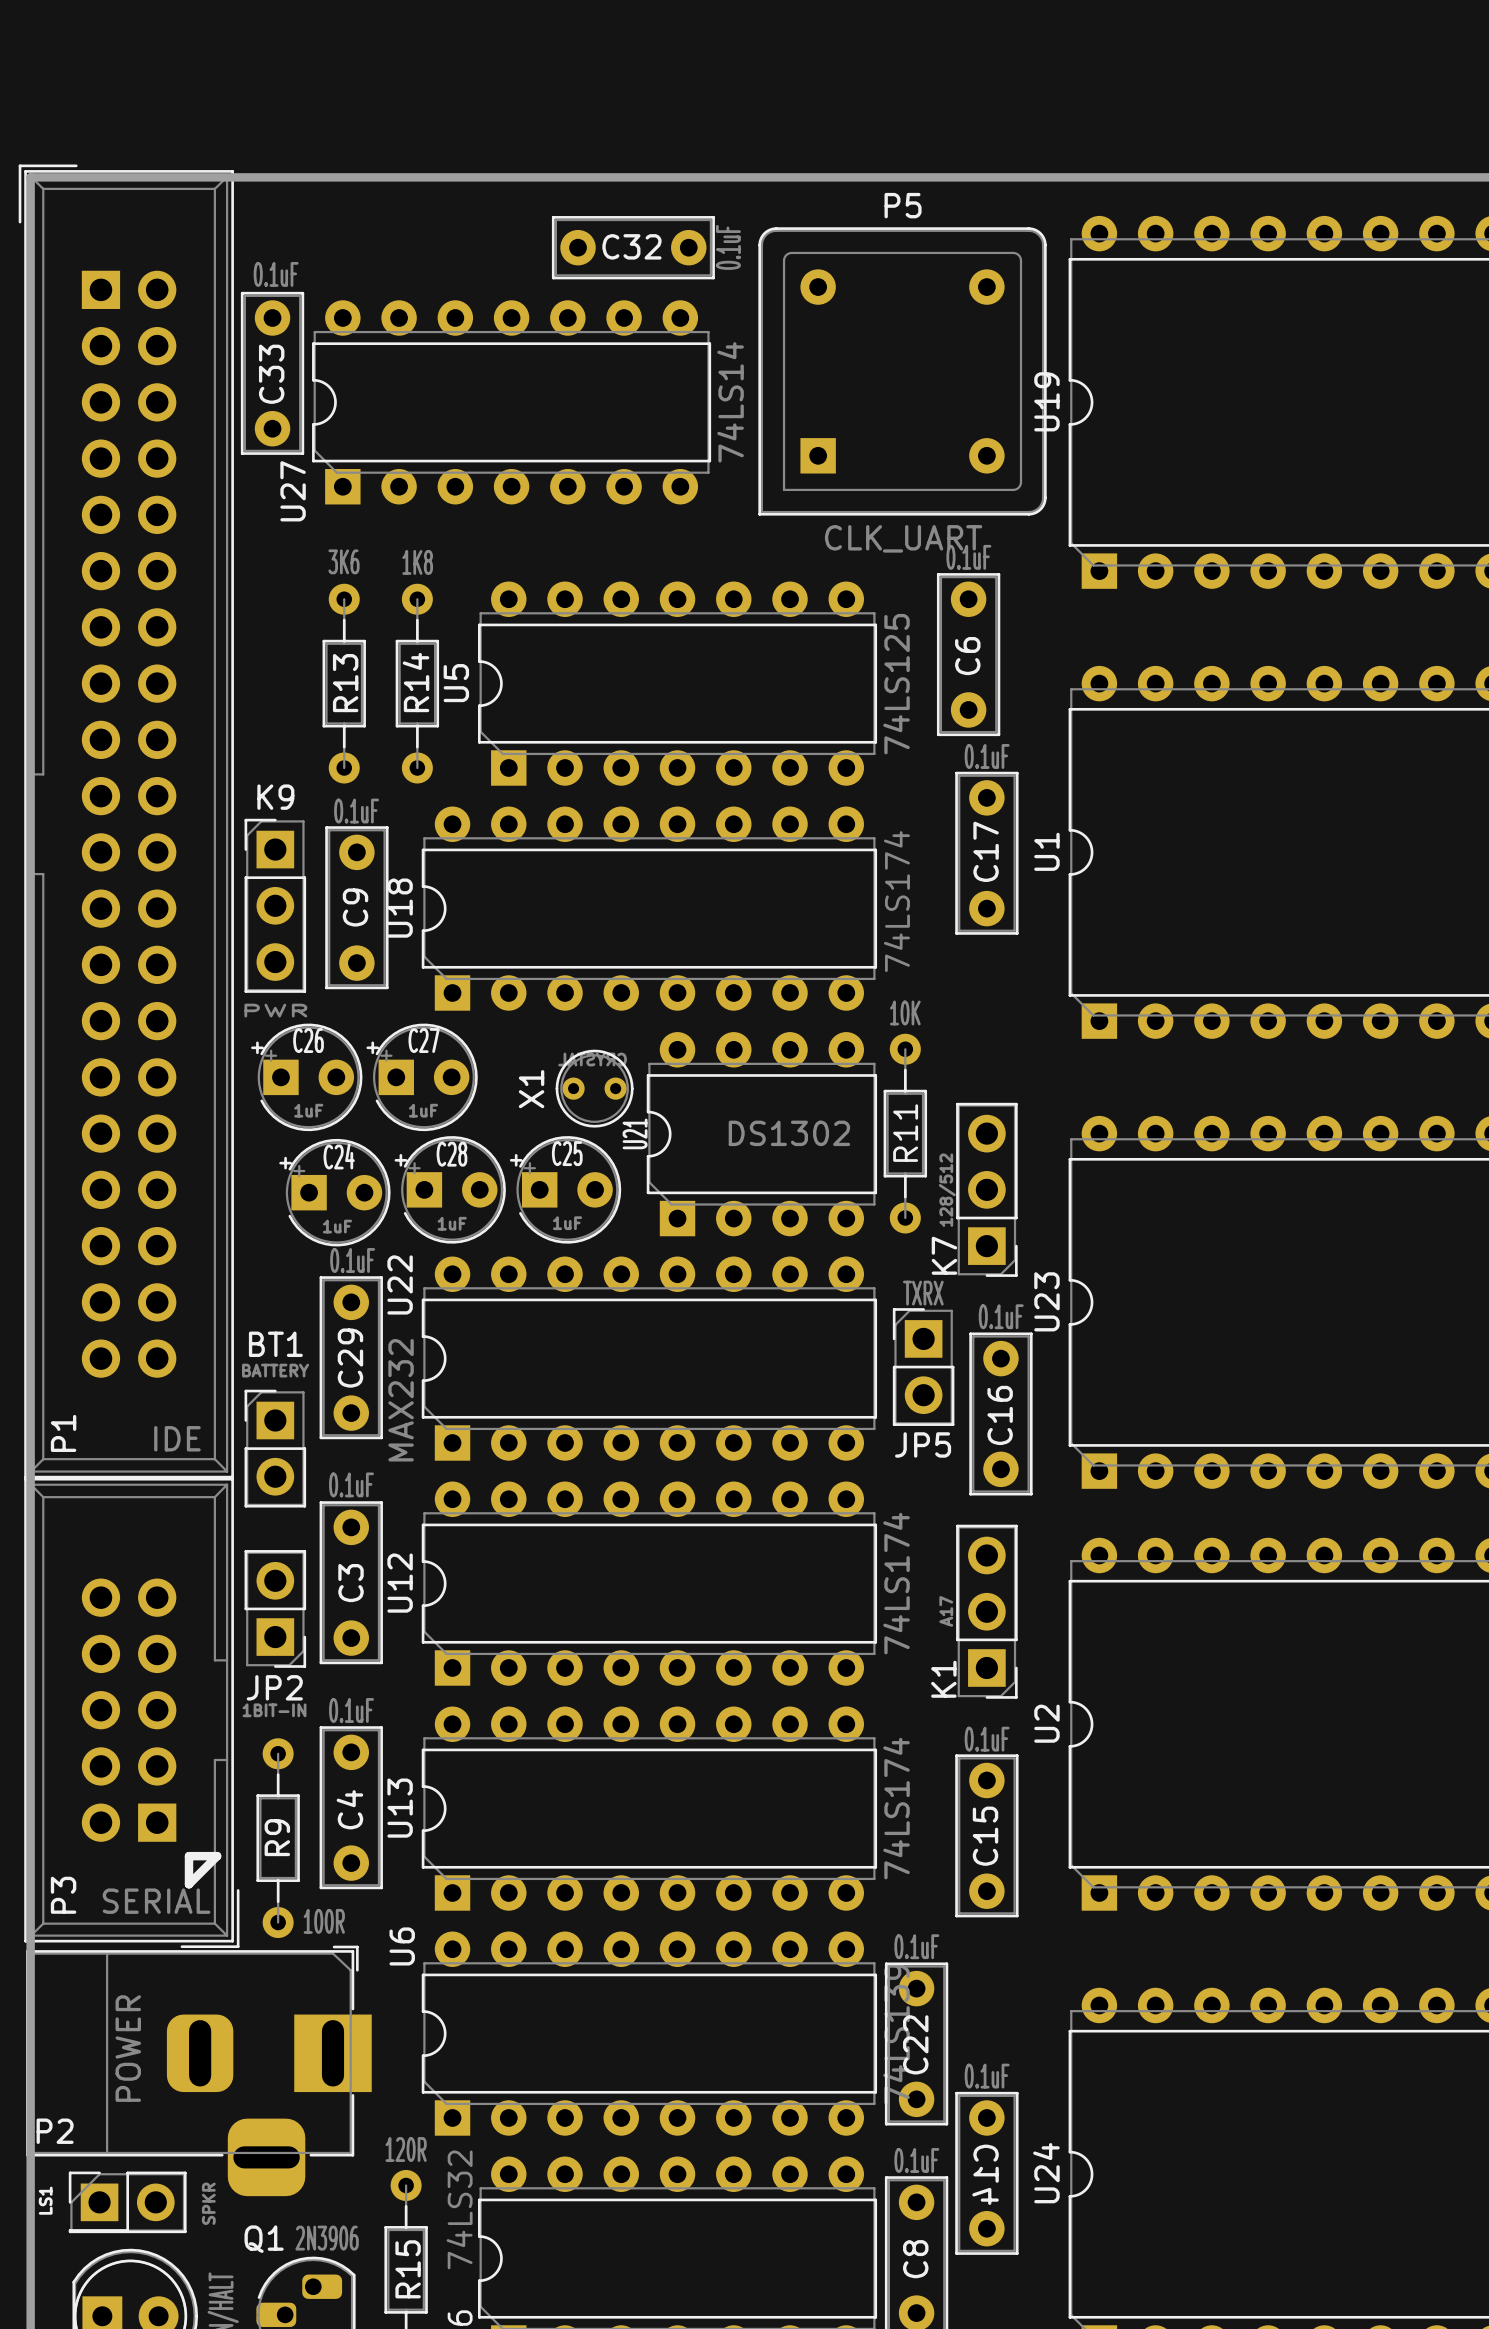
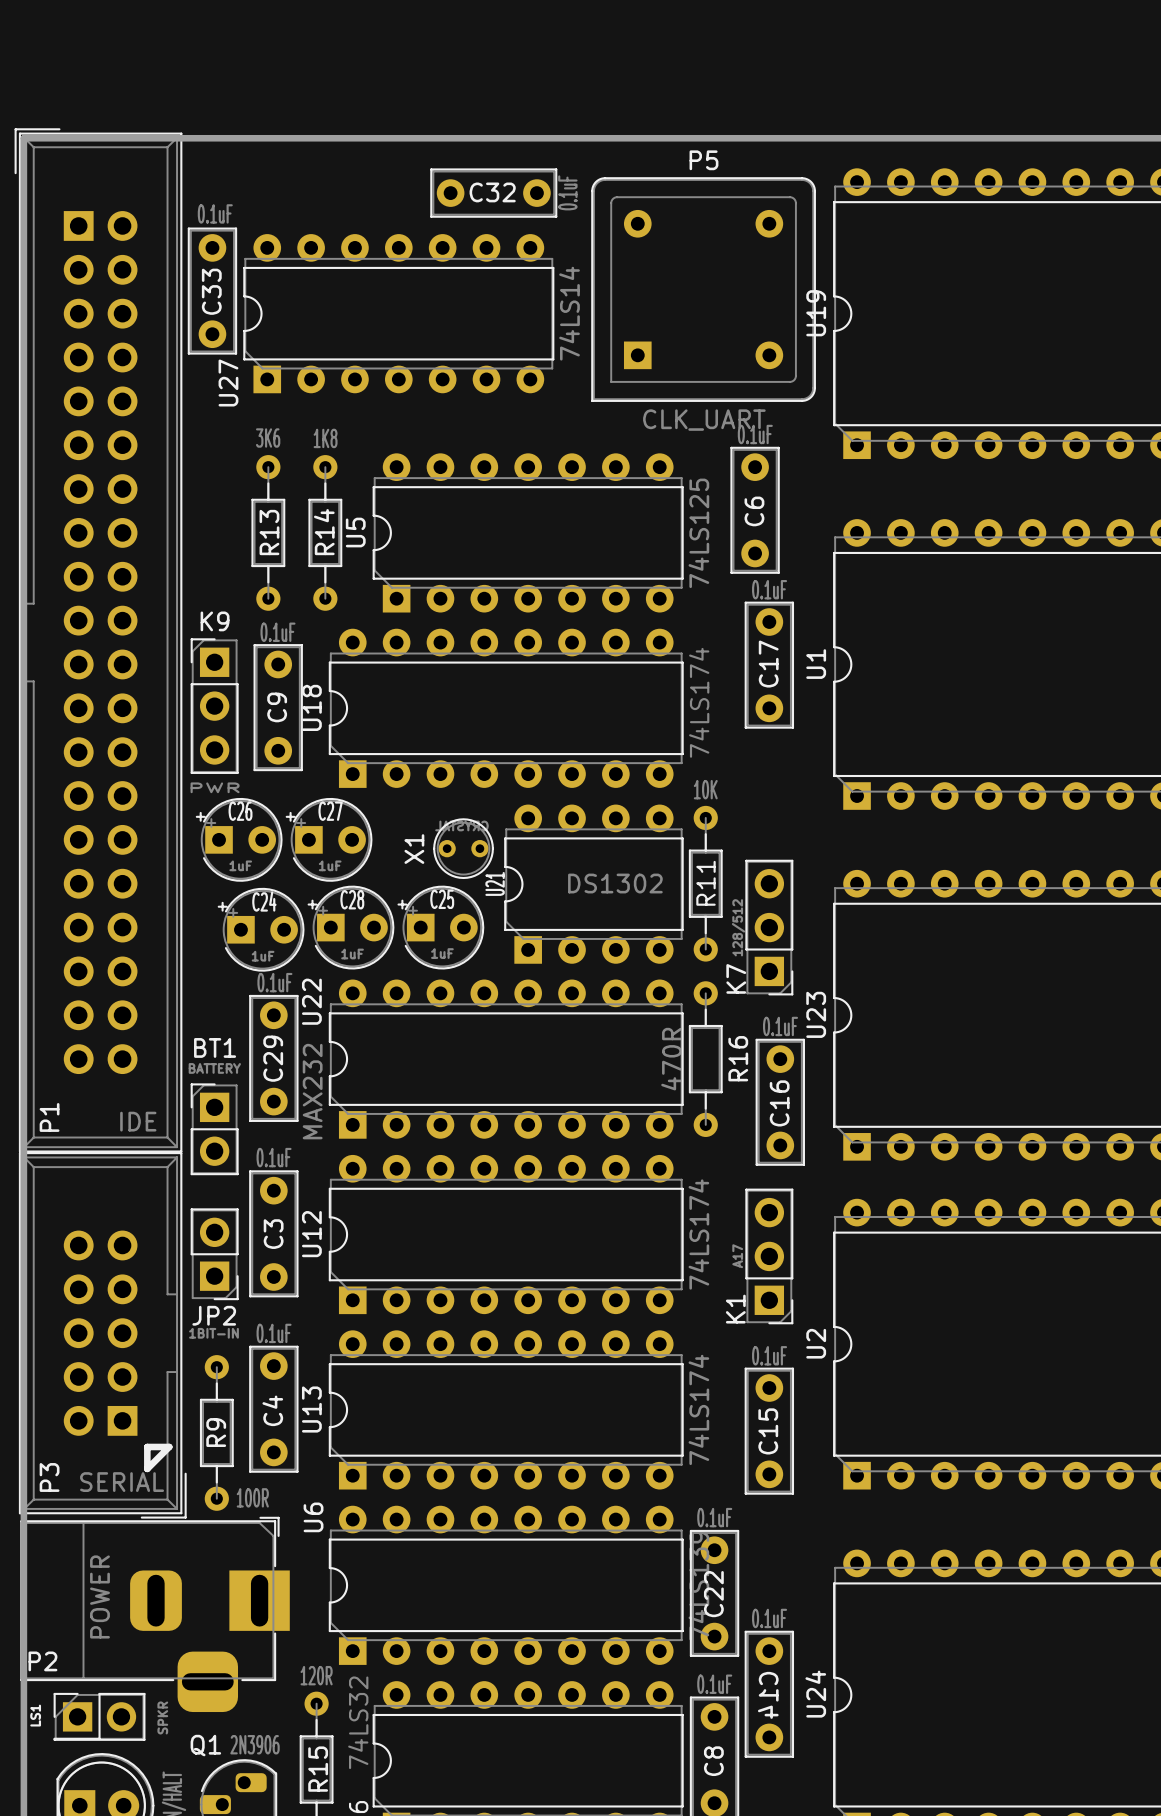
R16: none -> 470R (705, 1059)
JP5: TXRX (923, 1367) -> none

